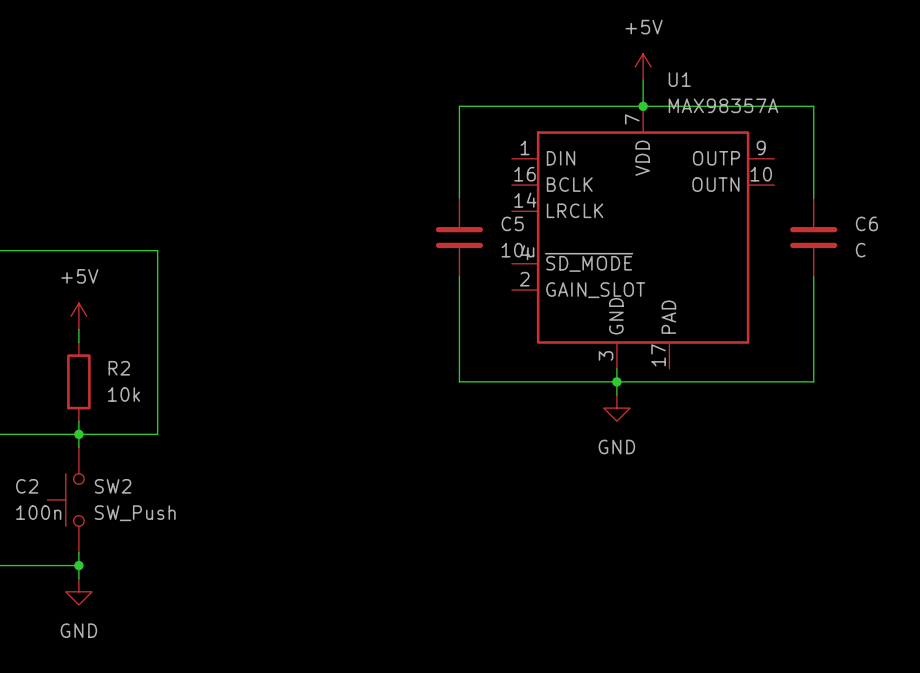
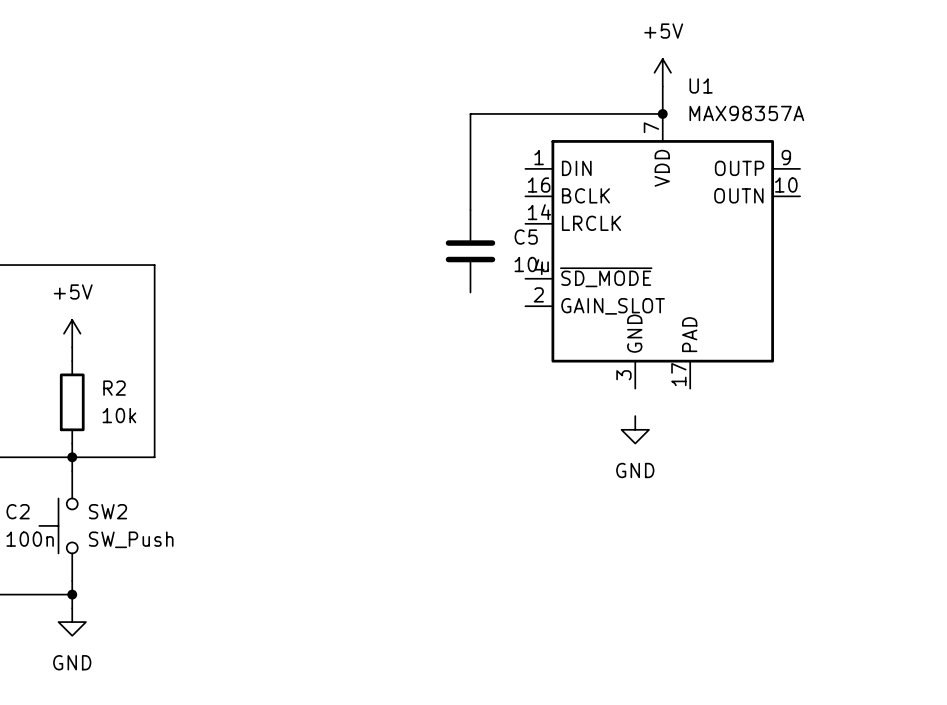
wire: (643, 106) (813, 106) (813, 198) -> none
C6: C (813, 237) -> none
wire: (459, 276) (459, 381) (813, 381) (813, 276) -> none
wire: (616, 368) (616, 394) -> none
junction: (616, 381) -> none

